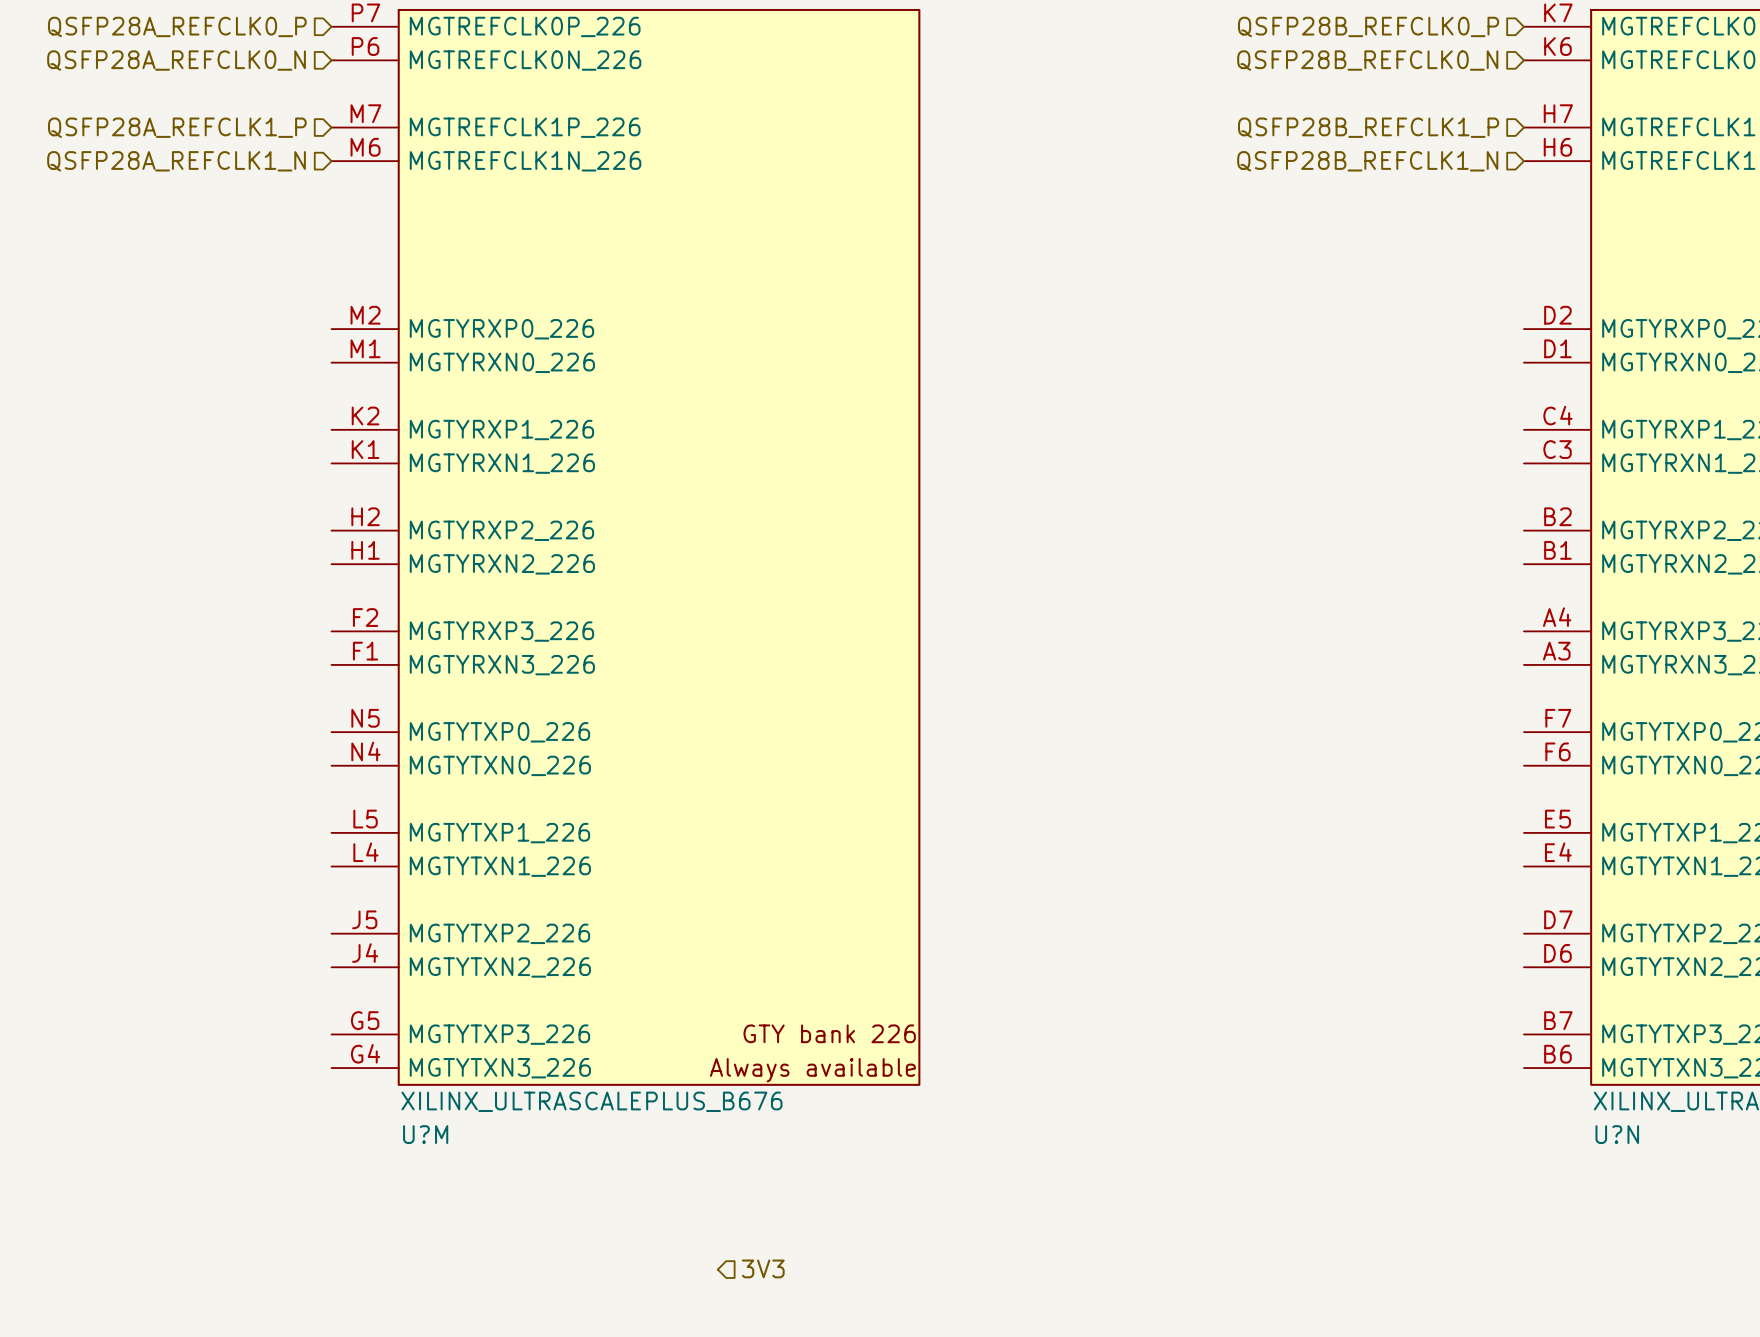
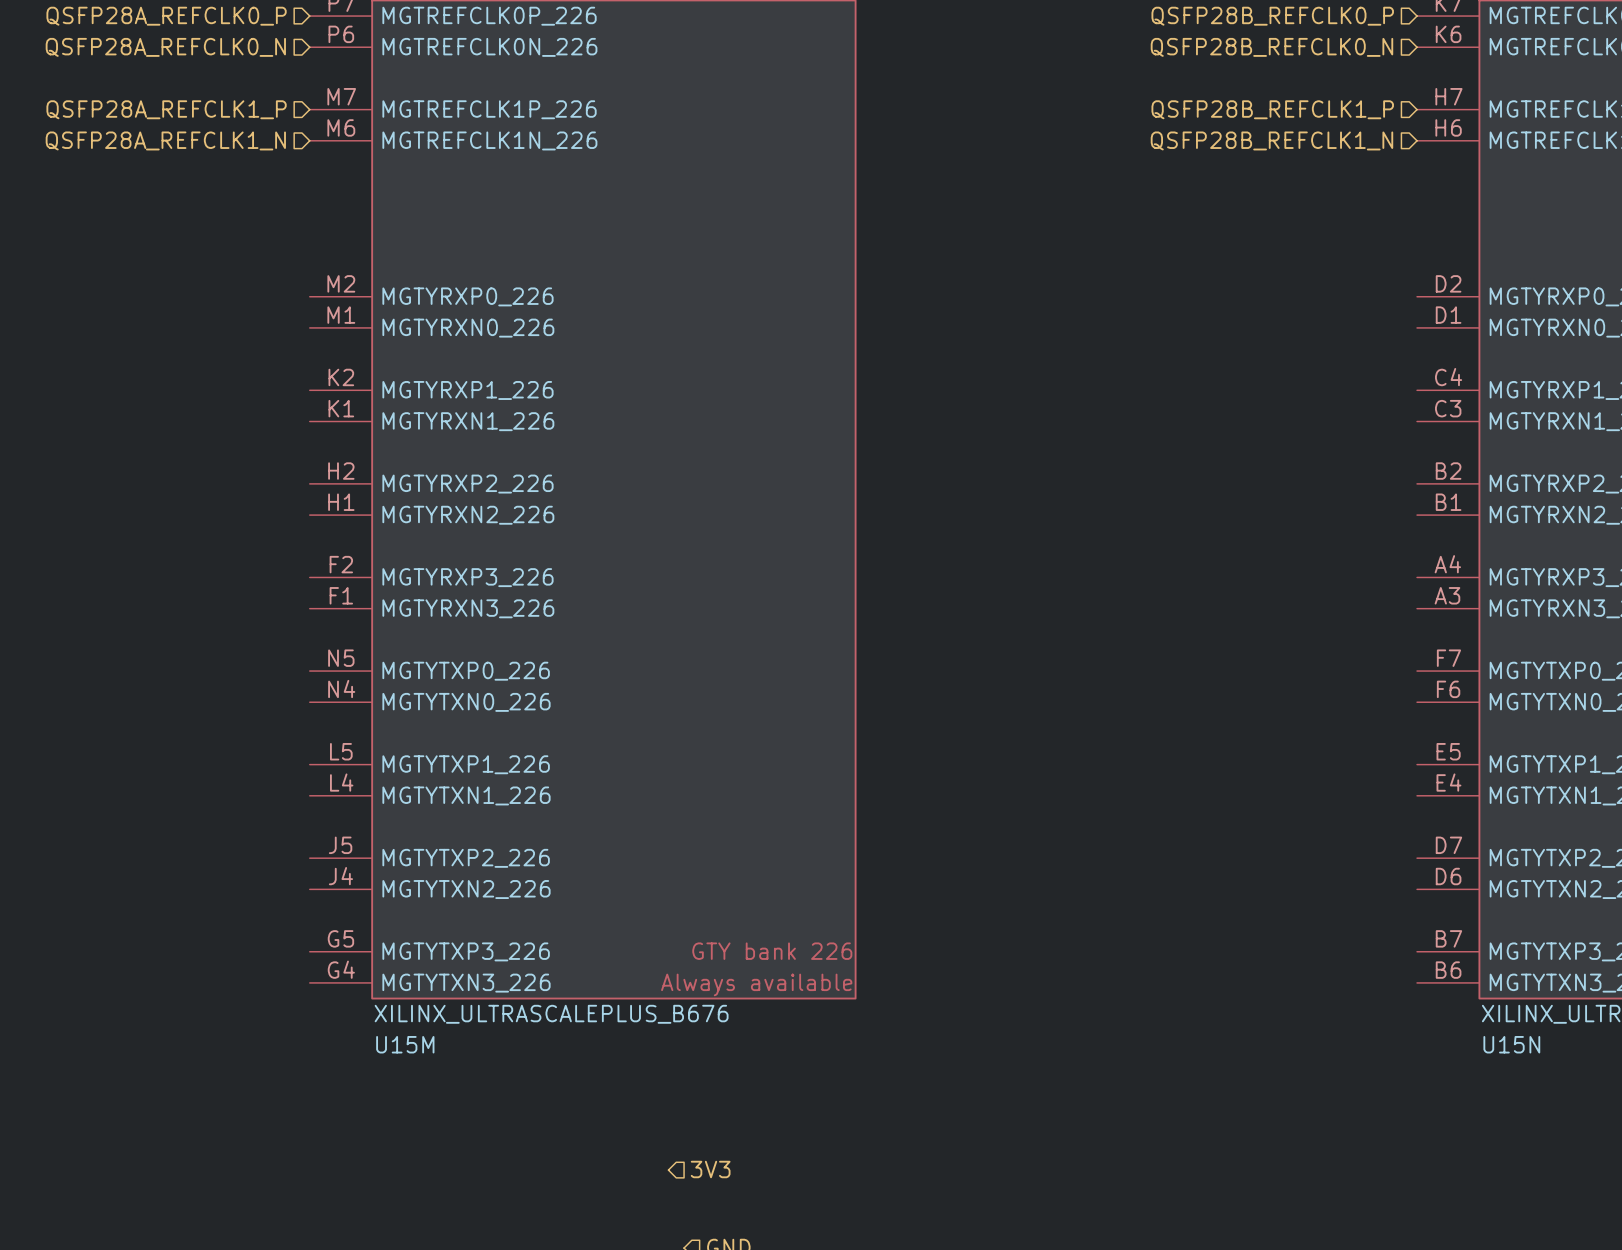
U?M name: U?M (425, 1134) -> U15M (405, 1044)
U?N name: U?N (1617, 1134) -> U15N (1511, 1044)

